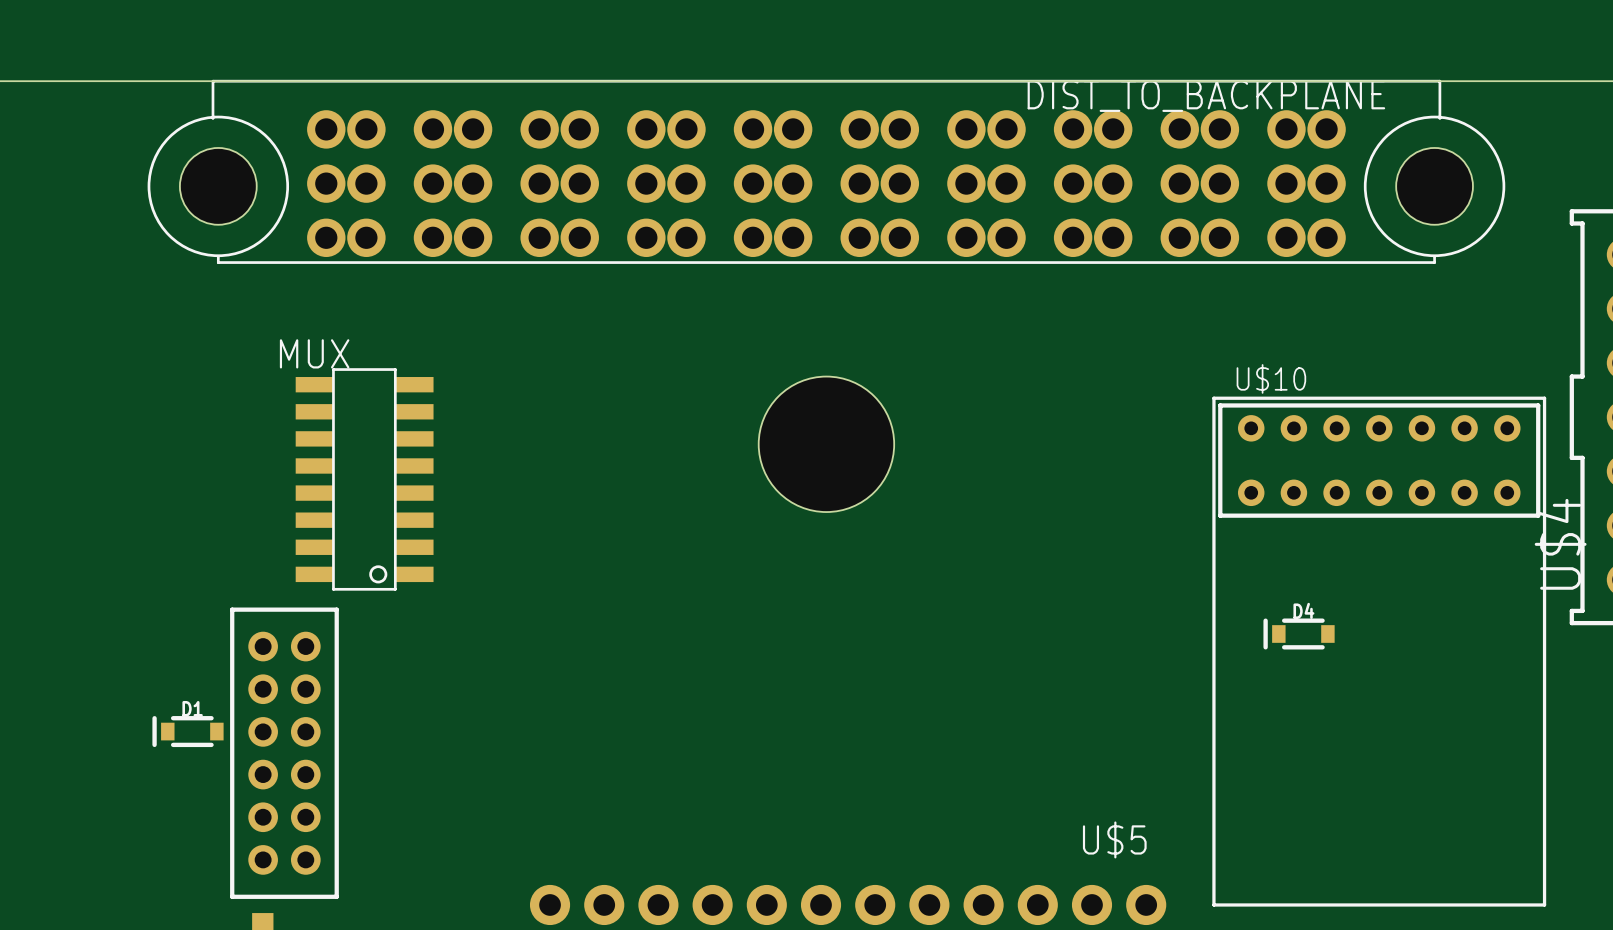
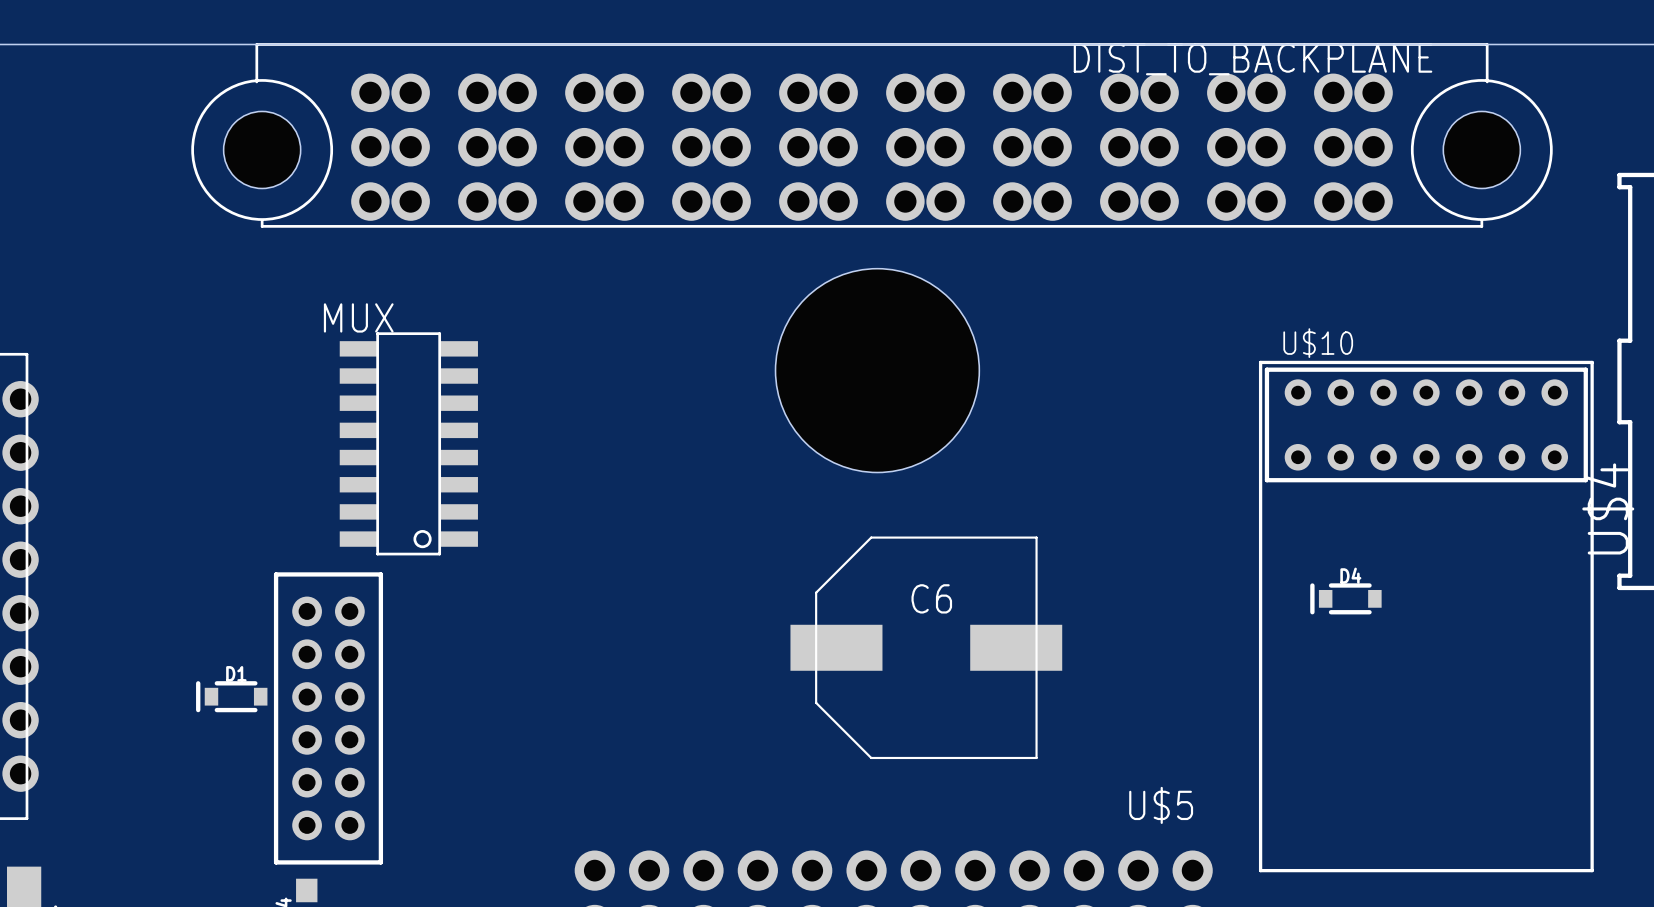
hole: none -> (877, 370)
hole: (826, 444) -> none
C6: none -> (926, 647)

